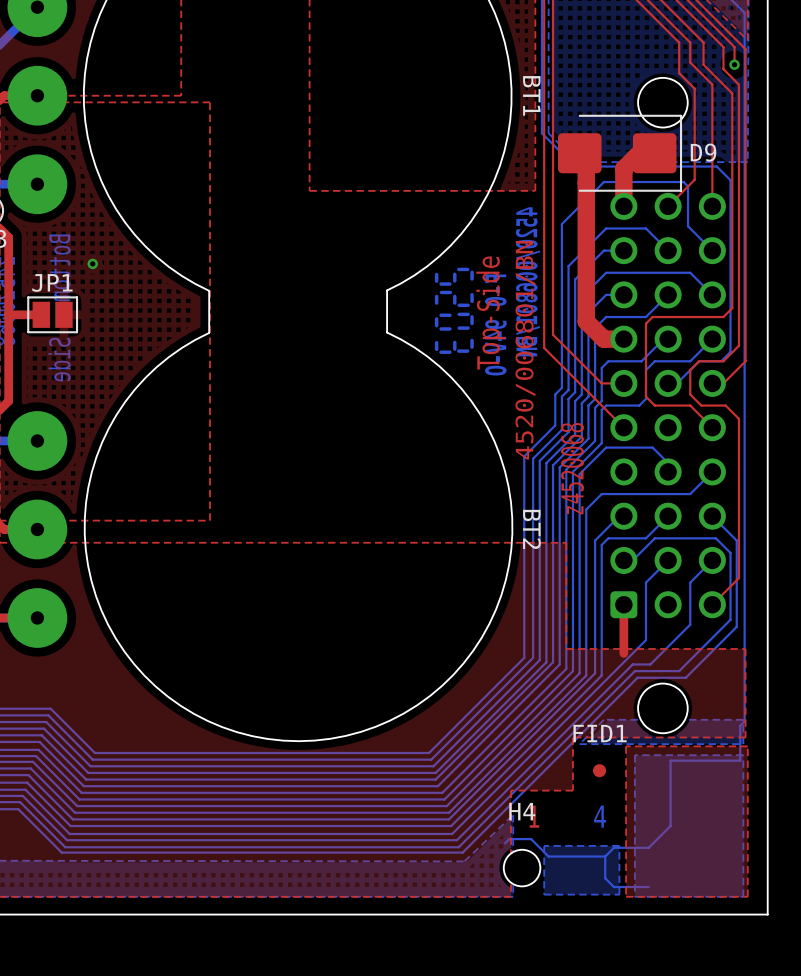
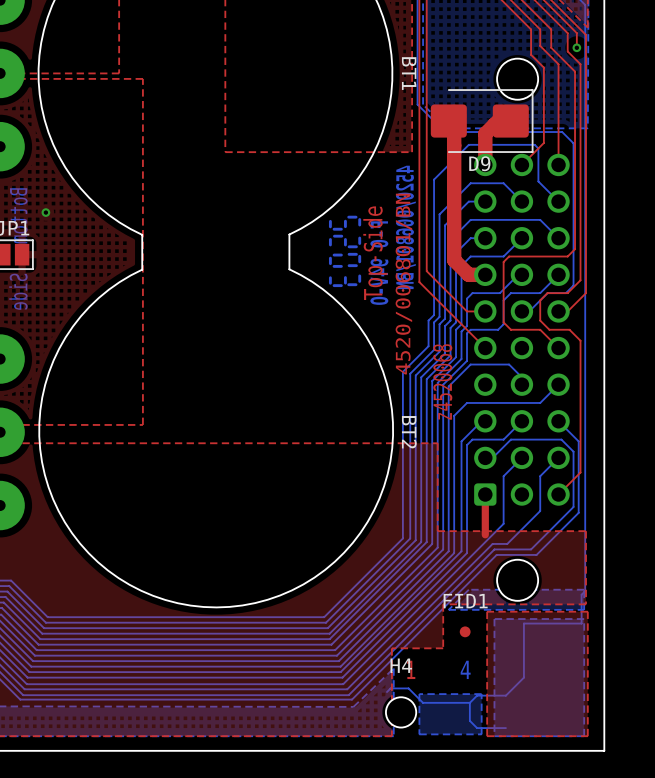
D9 name position: D9 (703, 152) -> D9 (479, 163)

